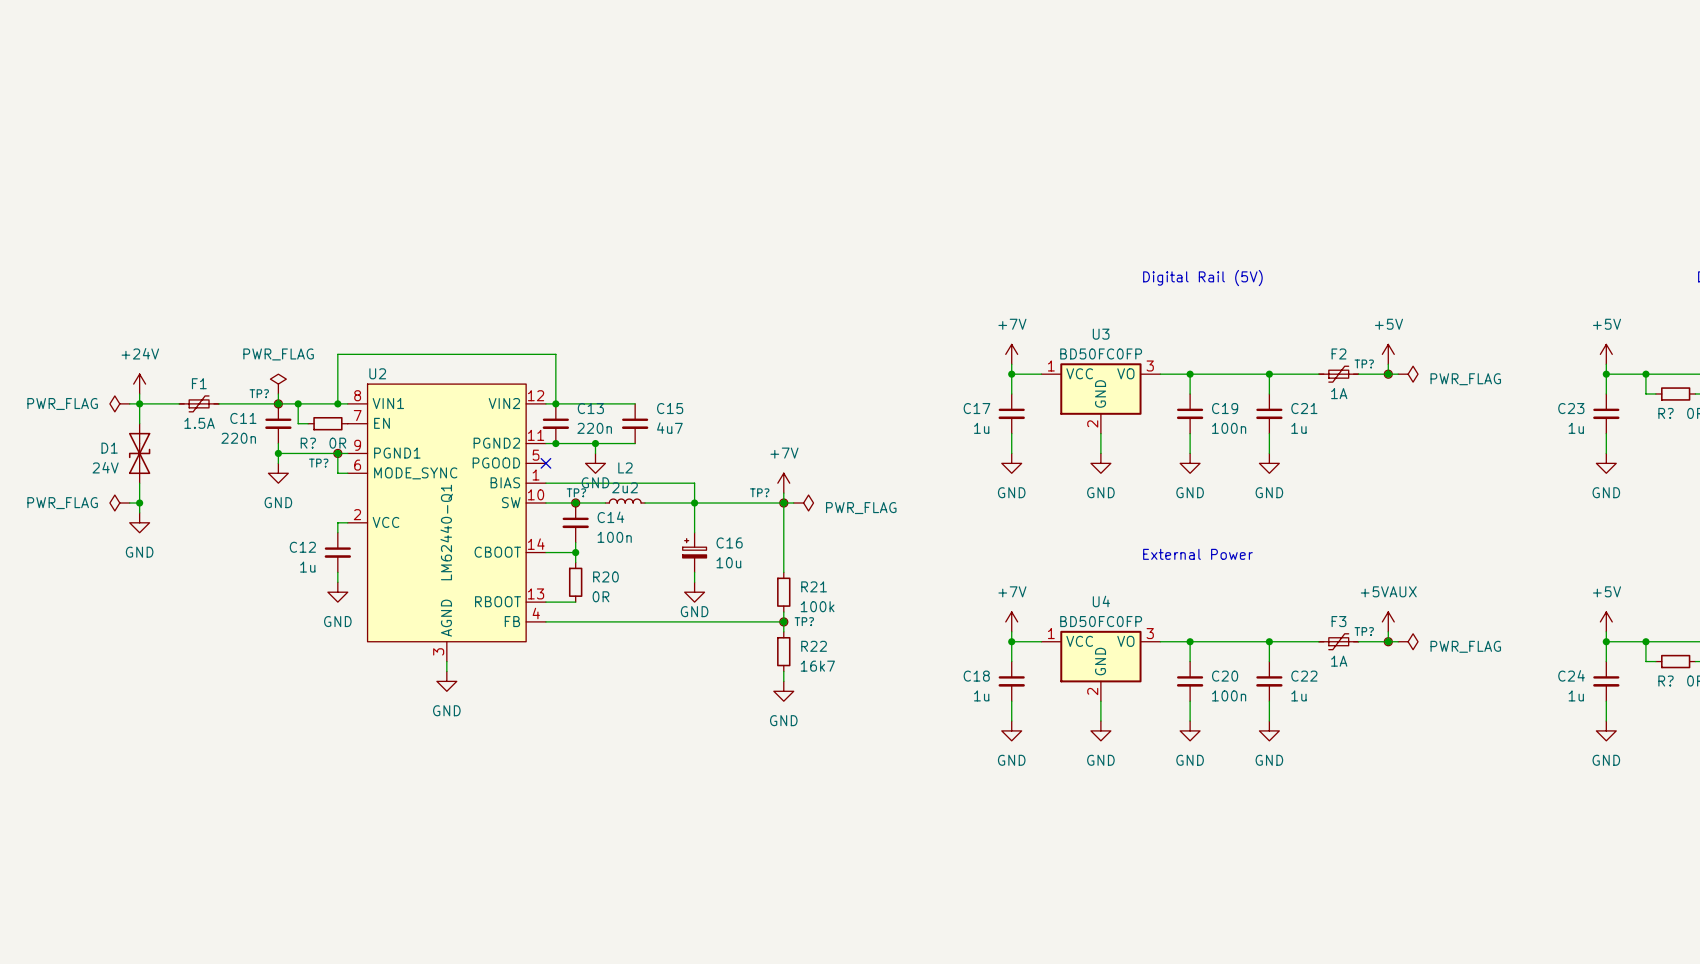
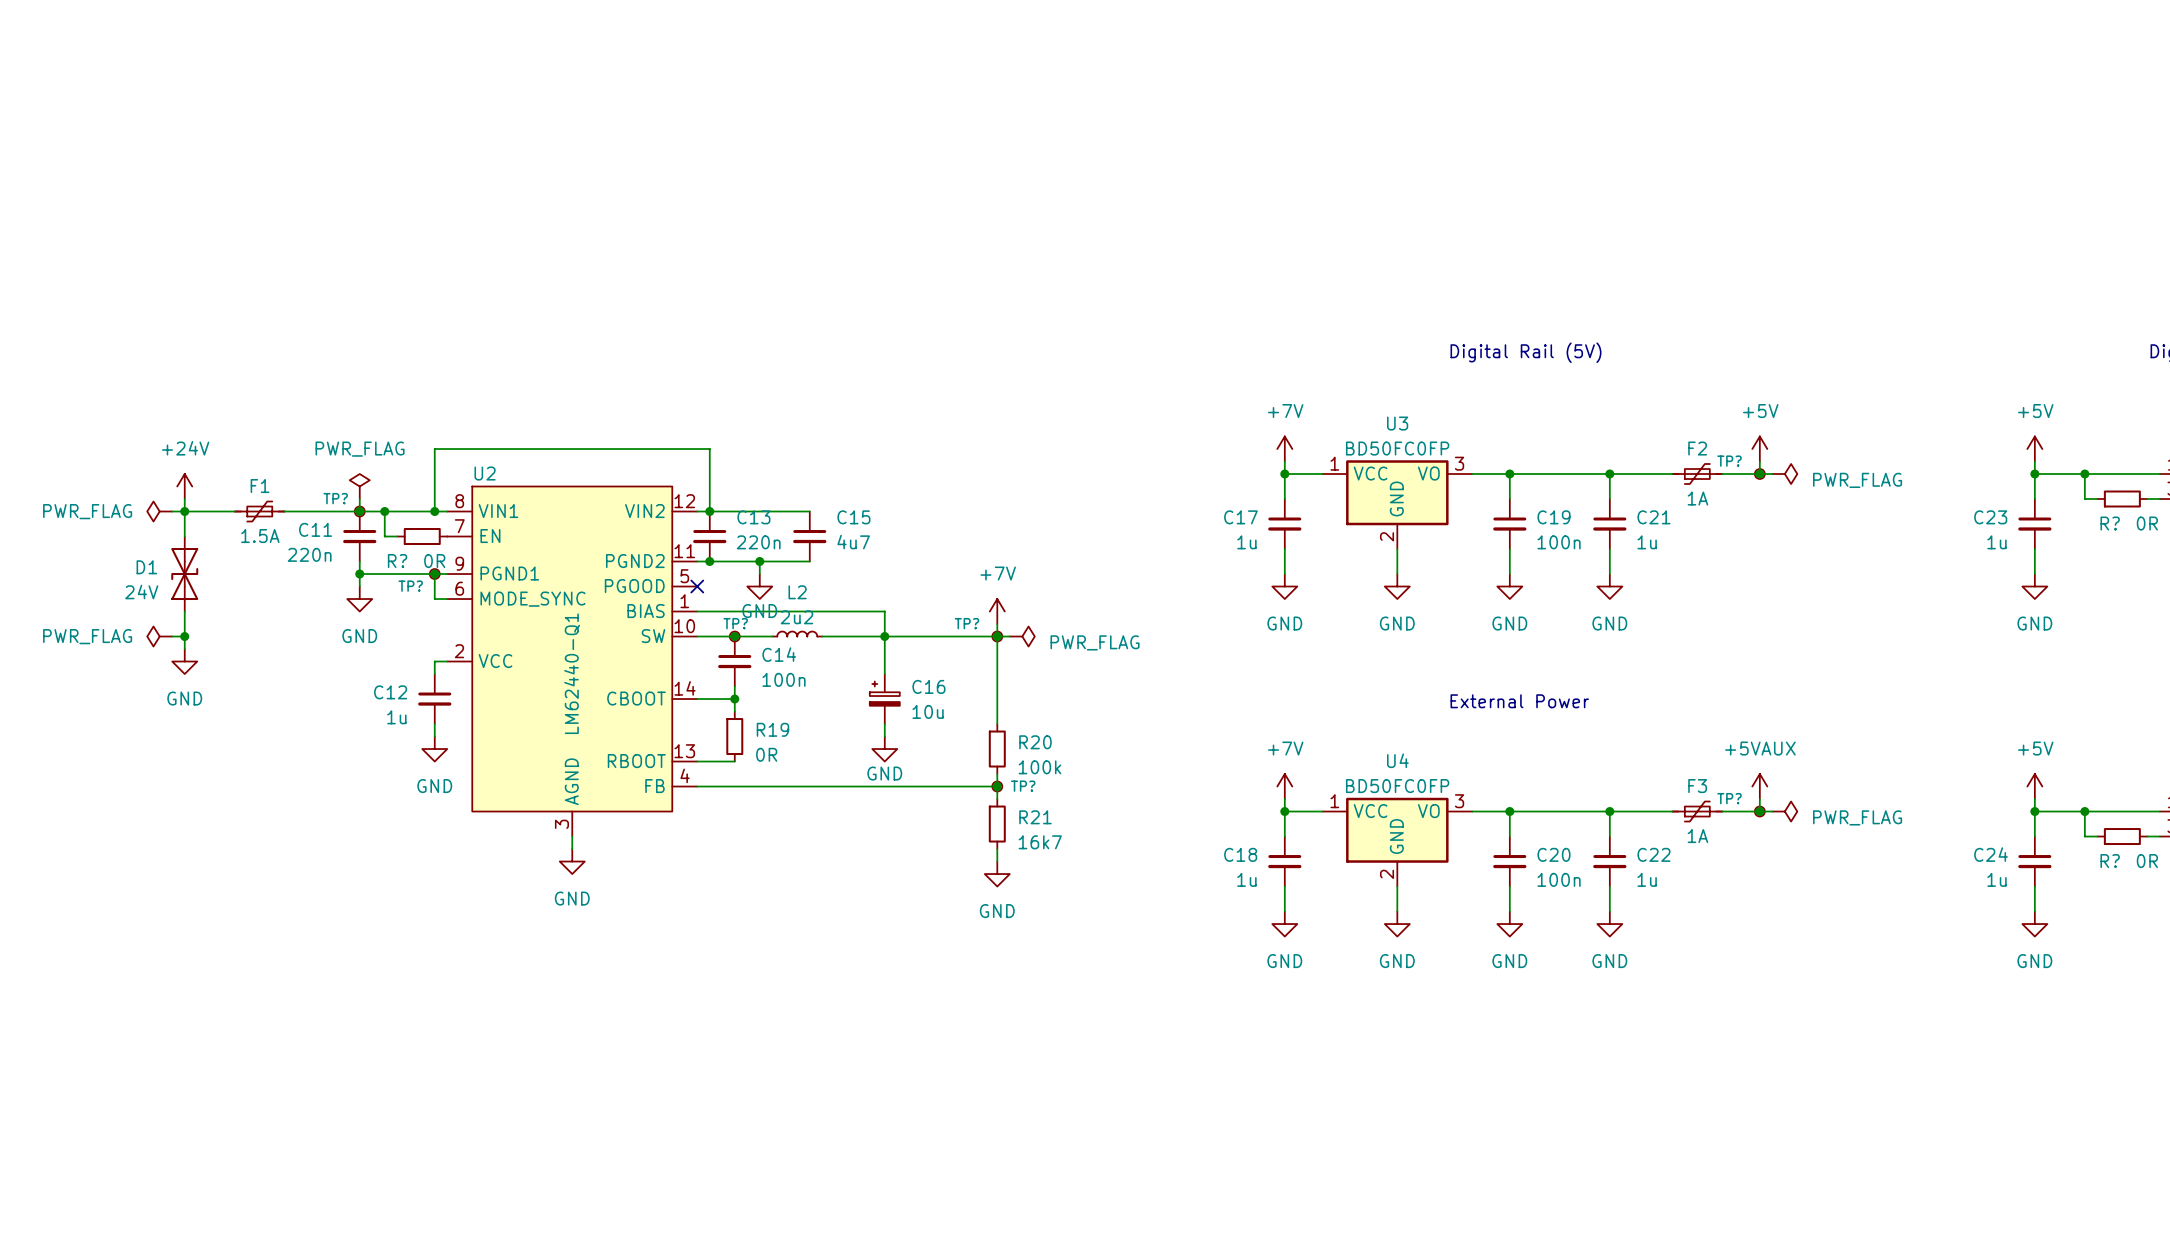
R20 name: R20 (605, 576) -> R19 (772, 729)
R21 name: R21 (814, 586) -> R20 (1035, 742)
R22 name: R22 (814, 646) -> R21 (1035, 817)

